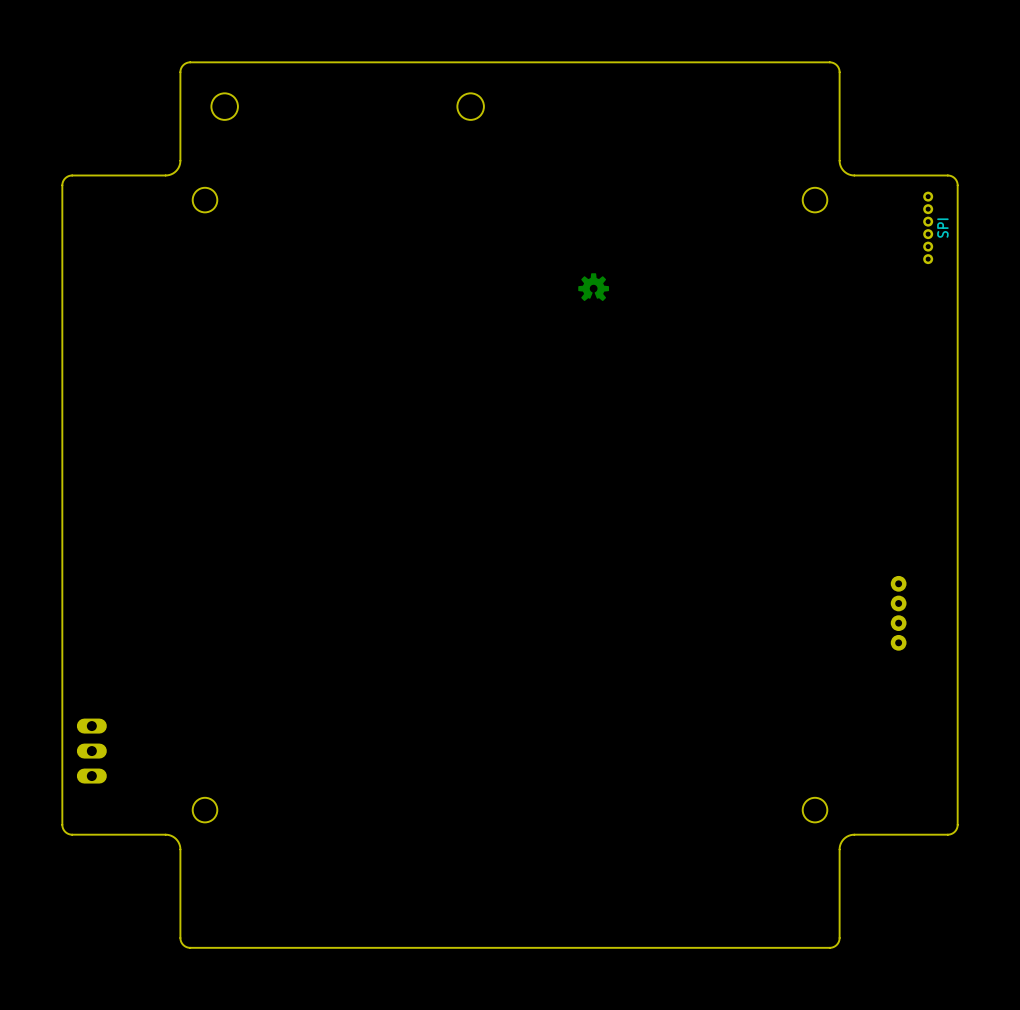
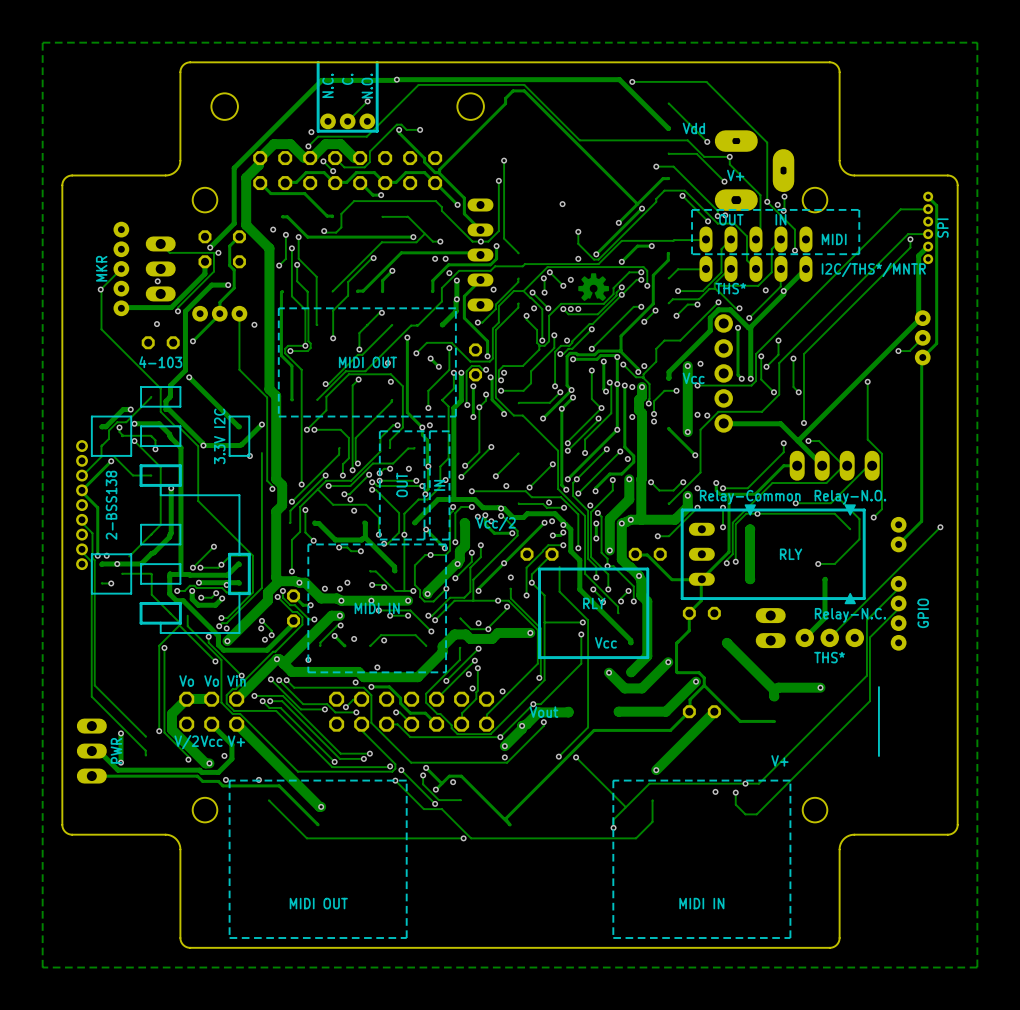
zone outline: none -> (977, 42) (42, 42) (42, 967) (977, 967) (977, 42)
line: none -> (377, 62) (377, 131) (318, 131) (318, 62)
text: none -> C. (347, 79)
via: none -> (396, 79)
track: none -> (632, 81) (706, 81) (767, 142) (767, 201) (794, 229) (794, 250)
via: none -> (632, 81)
text: none -> N.C. (327, 85)
text: none -> N.O. (367, 85)
track: none -> (367, 101) (347, 121)
via: none -> (367, 101)
track: none -> (668, 103) (707, 141)
part: none -> (347, 121)
track: none -> (668, 128) (619, 79) (321, 80) (234, 168) (234, 223) (210, 247)
text: none -> Vdd (693, 128)
track: none -> (399, 129) (399, 132) (424, 158) (424, 162) (435, 172) (438, 172)
via: none -> (399, 129)
track: none -> (420, 129) (406, 129) (401, 124) (396, 124) (369, 151) (369, 162) (364, 167) (344, 167) (335, 158)
via: none -> (420, 129)
via: none -> (311, 132)
via: none -> (707, 141)
track: none -> (308, 146) (318, 136) (366, 136) (418, 84) (524, 84) (579, 140) (687, 140) (704, 156) (729, 156) (729, 164) (760, 195) (760, 234) (756, 239)
via: none -> (308, 146)
track: none -> (668, 153) (696, 153) (724, 181)
via: none -> (729, 156)
track: none -> (360, 158) (354, 157) (340, 144) (325, 144) (310, 158) (303, 157) (290, 144) (273, 144) (260, 157) (258, 165) (246, 177) (246, 225) (269, 248) (269, 389) (276, 396) (276, 479) (282, 485) (282, 505) (276, 511) (276, 577) (279, 581)
track: none -> (504, 160) (504, 238) (518, 253)
via: none -> (504, 160)
track: none -> (323, 161) (333, 171)
via: none -> (323, 161)
track: none -> (656, 166) (673, 166) (717, 210) (717, 216)
via: none -> (656, 166)
part: none -> (347, 170)
part: none -> (754, 170)
via: none -> (333, 171)
track: none -> (438, 172) (464, 198) (464, 213) (480, 229)
track: none -> (438, 172) (439, 169) (505, 103) (505, 98) (513, 90) (524, 90) (637, 204)
text: none -> V+ (735, 175)
track: none -> (668, 178) (663, 178) (618, 222)
track: none -> (498, 180) (498, 231) (488, 241) (472, 241) (441, 210) (441, 207) (435, 201) (354, 201) (341, 213) (341, 227) (336, 232) (324, 231)
via: none -> (498, 180)
via: none -> (724, 181)
track: none -> (260, 183) (270, 193) (304, 193) (327, 216) (332, 216)
track: none -> (285, 183) (296, 182) (306, 172) (324, 172) (335, 183) (346, 182) (356, 172) (374, 172) (385, 183) (396, 182) (405, 172) (424, 172) (457, 204)
track: none -> (360, 183) (372, 195) (381, 195)
via: none -> (381, 195)
track: none -> (682, 195) (708, 221)
via: none -> (682, 195)
track: none -> (784, 196) (783, 210)
via: none -> (784, 196)
track: none -> (928, 196) (936, 205) (936, 343) (921, 358) (921, 521) (898, 544)
via: none -> (767, 201)
via: none -> (457, 204)
via: none -> (562, 204)
via: none -> (777, 204)
track: none -> (642, 208) (596, 254)
via: none -> (642, 208)
line: none -> (859, 209) (692, 209) (692, 254) (859, 254) (859, 209)
track: none -> (928, 209) (900, 209) (756, 354) (756, 381) (751, 385) (697, 385)
via: none -> (783, 210)
via: none -> (725, 215)
track: none -> (282, 216) (287, 216) (307, 237) (413, 237)
track: none -> (382, 216) (407, 216)
track: none -> (407, 216) (432, 241) (440, 241)
via: none -> (717, 216)
text: none -> OUT (731, 219)
text: none -> IN (780, 219)
via: none -> (708, 221)
via: none -> (618, 222)
via: none -> (273, 229)
via: none -> (324, 231)
track: none -> (578, 231) (578, 243) (594, 259) (598, 259) (656, 201) (656, 198) (664, 190) (684, 190) (717, 223) (734, 223) (747, 236) (747, 260) (755, 268)
via: none -> (578, 231)
track: none -> (425, 233) (416, 242) (381, 242) (332, 291)
track: none -> (285, 234) (285, 258) (279, 265)
via: none -> (285, 234)
track: none -> (928, 234) (908, 234) (779, 363) (779, 394) (762, 411) (718, 411) (700, 429) (700, 472) (668, 503)
track: none -> (239, 236) (229, 246) (229, 265) (234, 270) (234, 288) (219, 302) (219, 315) (192, 341)
track: none -> (298, 237) (298, 258) (316, 276) (317, 324)
via: none -> (298, 237)
via: none -> (413, 237)
track: none -> (706, 239) (621, 240) (598, 264) (525, 264) (522, 266) (495, 266) (490, 270) (459, 270) (441, 288) (441, 301) (417, 325) (411, 325) (365, 371) (345, 371) (317, 399)
track: none -> (730, 239) (721, 249) (721, 272) (702, 291) (678, 291)
part: none -> (755, 239)
track: none -> (780, 239) (771, 249) (771, 272) (758, 285) (720, 285)
text: none -> MIDI (834, 239)
track: none -> (910, 239) (910, 247) (803, 354) (803, 423)
via: none -> (910, 239)
via: none -> (440, 241)
via: none -> (480, 241)
track: none -> (160, 243) (169, 252) (218, 252)
track: none -> (496, 246) (496, 258) (490, 264) (448, 264) (432, 280) (432, 291)
via: none -> (496, 246)
track: none -> (651, 246) (637, 246) (621, 261)
via: none -> (651, 246)
track: none -> (928, 246) (918, 255) (918, 314) (922, 318) (797, 441)
via: none -> (210, 247)
track: none -> (291, 248) (291, 296) (305, 309) (305, 345) (288, 345) (285, 348) (285, 353) (301, 369) (301, 484)
via: none -> (291, 248)
part: none -> (205, 249)
part: none -> (239, 249)
via: none -> (794, 250)
track: none -> (213, 252) (213, 271) (177, 307) (177, 311)
via: none -> (218, 252)
track: none -> (668, 253) (668, 260) (653, 275) (653, 303) (621, 336) (620, 351)
track: none -> (480, 254) (478, 252) (401, 252) (363, 291) (357, 291)
part: none -> (480, 254)
via: none -> (596, 254)
track: none -> (373, 258) (348, 282) (348, 295) (333, 310) (333, 338)
via: none -> (373, 258)
via: none -> (435, 258)
via: none -> (445, 258)
via: none -> (578, 258)
track: none -> (204, 261) (204, 273) (171, 307) (121, 308)
via: none -> (621, 261)
track: none -> (297, 264) (297, 281) (307, 291) (308, 341) (310, 348) (307, 351) (290, 351)
via: none -> (297, 264)
via: none -> (279, 265)
text: none -> MKR (101, 268)
track: none -> (121, 268) (100, 289) (101, 329) (160, 388) (160, 411) (198, 446) (198, 501) (252, 555) (252, 592) (227, 617) (221, 617)
part: none -> (121, 268)
part: none -> (160, 268)
track: none -> (706, 268) (678, 269) (668, 278)
track: none -> (730, 268) (714, 283) (714, 288) (735, 308) (739, 308)
part: none -> (755, 268)
track: none -> (780, 268) (780, 286) (749, 318)
track: none -> (805, 268) (750, 327) (750, 378)
text: none -> I2C/THS*/MNTR (873, 269)
track: none -> (392, 270) (382, 280) (382, 291)
via: none -> (392, 270)
track: none -> (549, 272) (563, 285)
via: none -> (549, 272)
track: none -> (641, 272) (629, 272) (613, 288) (613, 294) (603, 303) (561, 303) (549, 315) (549, 341) (544, 345) (540, 345) (537, 342) (537, 330) (526, 319) (526, 315)
via: none -> (641, 272)
via: none -> (449, 273)
track: none -> (518, 278) (518, 282) (495, 304) (495, 309) (482, 322) (477, 322)
track: none -> (543, 278) (544, 292)
via: none -> (543, 278)
track: none -> (480, 279) (464, 296) (464, 318) (487, 341) (487, 356)
via: none -> (570, 279)
track: none -> (641, 279) (636, 279) (569, 345) (561, 345) (555, 351) (555, 386)
via: none -> (641, 279)
track: none -> (456, 280) (456, 311) (442, 324)
via: none -> (456, 280)
via: none -> (157, 281)
track: none -> (228, 285) (211, 285) (185, 311) (185, 370) (170, 385) (170, 396) (165, 401) (165, 409) (168, 408) (203, 445) (241, 444) (261, 424)
via: none -> (228, 285)
via: none -> (563, 285)
track: none -> (647, 285) (647, 270) (643, 267) (547, 267) (523, 291)
via: none -> (647, 285)
track: none -> (621, 287) (616, 292) (616, 295) (597, 314) (568, 314) (563, 309)
via: none -> (621, 287)
track: none -> (715, 288) (709, 288) (699, 299) (672, 299) (668, 303)
text: none -> THS* (730, 288)
via: none -> (100, 289)
via: none -> (493, 289)
via: none -> (765, 290)
track: none -> (282, 291) (281, 355) (291, 366) (292, 399)
track: none -> (523, 291) (513, 291) (498, 306) (498, 322) (492, 328) (492, 358) (489, 361) (470, 361) (451, 342) (426, 342) (416, 353)
track: none -> (523, 291) (542, 309) (542, 340)
via: none -> (678, 291)
via: none -> (783, 291)
track: none -> (532, 292) (548, 308)
via: none -> (532, 292)
via: none -> (544, 292)
via: none -> (621, 294)
via: none -> (456, 299)
track: none -> (718, 302) (680, 340) (664, 340) (656, 348) (656, 361) (643, 374) (643, 377)
via: none -> (718, 302)
track: none -> (518, 303) (518, 307) (495, 330) (495, 397) (513, 415) (522, 415) (558, 450) (558, 489) (585, 516) (585, 573) (618, 606) (618, 613)
track: none -> (697, 304) (687, 304) (676, 315)
via: none -> (697, 304)
track: none -> (641, 306) (633, 306) (591, 348)
via: none -> (641, 306)
line: none -> (455, 308) (278, 308) (278, 416) (455, 416) (455, 308)
via: none -> (534, 308)
via: none -> (548, 308)
via: none -> (739, 308)
via: none -> (563, 309)
via: none -> (570, 309)
via: none -> (578, 309)
track: none -> (655, 310) (644, 321)
via: none -> (655, 310)
via: none -> (177, 311)
track: none -> (381, 312) (379, 312) (359, 333) (359, 349)
via: none -> (381, 312)
part: none -> (219, 313)
track: none -> (239, 313) (239, 369) (267, 397) (267, 480) (272, 486) (272, 489)
via: none -> (526, 315)
via: none -> (676, 315)
via: none -> (749, 318)
via: none -> (644, 321)
via: none -> (477, 322)
via: none -> (156, 324)
via: none -> (254, 324)
track: none -> (392, 324) (362, 354) (357, 354) (328, 384) (325, 384)
track: none -> (738, 327) (738, 375) (741, 378)
via: none -> (738, 327)
track: none -> (750, 327) (730, 309) (718, 309) (710, 318) (710, 330) (669, 372) (668, 378)
track: none -> (591, 329) (572, 348) (568, 348) (563, 354) (560, 354)
via: none -> (591, 329)
track: none -> (554, 335) (554, 348) (531, 371) (531, 383) (523, 390) (501, 390)
via: none -> (554, 335)
track: none -> (407, 337) (407, 412) (422, 427) (422, 435) (427, 440) (428, 489) (425, 494)
via: none -> (407, 337)
track: none -> (922, 337) (909, 351) (898, 351)
part: none -> (922, 337)
via: none -> (333, 338)
via: none -> (542, 340)
via: none -> (567, 340)
track: none -> (778, 340) (778, 354) (766, 366)
via: none -> (778, 340)
via: none -> (192, 341)
part: none -> (160, 342)
via: none -> (305, 345)
track: none -> (539, 345) (539, 349) (522, 366) (503, 366) (498, 370) (498, 378) (501, 380)
track: none -> (449, 348) (449, 369) (428, 390) (428, 408)
via: none -> (449, 348)
via: none -> (591, 348)
via: none -> (359, 349)
via: none -> (290, 351)
track: none -> (620, 351) (638, 369) (638, 372)
track: none -> (620, 351) (598, 351) (594, 354) (570, 353) (567, 356) (567, 385) (571, 390) (543, 418)
via: none -> (898, 351)
via: none -> (416, 353)
via: none -> (560, 354)
via: none -> (487, 356)
track: none -> (761, 356) (761, 379) (773, 392)
via: none -> (761, 356)
via: none -> (617, 357)
track: none -> (430, 358) (438, 366)
via: none -> (430, 358)
track: none -> (793, 358) (793, 387) (798, 392)
via: none -> (793, 358)
track: none -> (573, 359) (597, 359) (600, 355) (617, 357) (617, 429) (567, 479)
via: none -> (573, 359)
track: none -> (603, 361) (603, 389) (606, 391)
via: none -> (603, 361)
text: none -> 4-103 (160, 362)
text: none -> MIDI OUT (367, 362)
part: none -> (475, 362)
via: none -> (387, 363)
via: none -> (700, 363)
track: none -> (623, 364) (636, 377) (642, 377) (649, 384) (648, 403)
via: none -> (623, 364)
via: none -> (438, 366)
via: none -> (644, 366)
track: none -> (687, 366) (687, 432)
via: none -> (687, 366)
via: none -> (766, 366)
track: none -> (486, 369) (479, 366) (471, 366) (466, 371) (467, 405)
via: none -> (486, 369)
track: none -> (591, 370) (591, 399) (601, 408) (567, 443)
via: none -> (591, 370)
track: none -> (453, 372) (453, 388) (442, 399) (448, 406) (448, 458) (440, 466) (440, 486) (427, 499) (418, 499) (404, 513) (404, 590)
via: none -> (453, 372)
track: none -> (461, 372) (461, 400) (453, 408) (453, 499)
via: none -> (461, 372)
via: none -> (504, 372)
via: none -> (638, 372)
part: none -> (723, 373)
track: none -> (189, 377) (239, 426)
via: none -> (189, 377)
track: none -> (490, 377) (492, 399) (504, 414)
via: none -> (490, 377)
text: none -> Vcc (693, 378)
via: none -> (741, 378)
via: none -> (750, 378)
track: none -> (358, 379) (352, 385) (352, 470)
via: none -> (358, 379)
via: none -> (501, 380)
via: none -> (390, 381)
track: none -> (867, 381) (867, 439) (881, 453) (881, 509) (873, 517)
via: none -> (867, 381)
track: none -> (609, 382) (611, 413) (585, 439) (585, 453)
via: none -> (609, 382)
via: none -> (325, 384)
via: none -> (617, 384)
track: none -> (624, 385) (624, 447) (633, 456) (633, 462) (621, 474) (609, 474) (595, 488) (595, 491)
via: none -> (624, 385)
via: none -> (697, 385)
track: none -> (473, 386) (473, 417)
via: none -> (473, 386)
via: none -> (555, 386)
line: none -> (180, 387) (141, 387) (141, 406) (180, 406) (180, 387)
via: none -> (632, 387)
track: none -> (642, 387) (642, 396) (639, 399) (639, 410) (642, 413) (641, 519)
via: none -> (642, 387)
via: none -> (501, 390)
via: none -> (571, 390)
track: none -> (676, 390) (664, 390) (654, 401) (654, 414)
via: none -> (676, 390)
via: none -> (606, 391)
track: none -> (560, 392) (549, 402) (518, 403)
via: none -> (560, 392)
via: none -> (773, 392)
via: none -> (798, 392)
track: none -> (486, 394) (486, 400) (479, 407) (479, 452) (465, 465)
via: none -> (486, 394)
track: none -> (151, 396) (126, 422) (117, 422) (108, 430) (108, 438) (101, 445) (101, 456) (82, 475)
track: none -> (573, 397) (561, 408) (561, 485) (566, 489)
via: none -> (573, 397)
track: none -> (392, 399) (355, 438) (355, 461) (357, 463)
via: none -> (648, 403)
via: none -> (467, 405)
via: none -> (479, 407)
via: none -> (428, 408)
via: none -> (561, 408)
via: none -> (601, 408)
track: none -> (130, 409) (123, 409) (105, 426) (101, 426)
via: none -> (130, 409)
via: none -> (504, 414)
via: none -> (654, 414)
via: none -> (697, 414)
via: none -> (707, 415)
line: none -> (131, 416) (91, 416) (91, 455) (131, 455) (131, 416)
line: none -> (249, 416) (229, 416) (229, 455) (249, 455) (249, 416)
via: none -> (473, 417)
via: none -> (632, 417)
via: none -> (543, 418)
track: none -> (598, 418) (567, 450)
via: none -> (598, 418)
via: none -> (654, 421)
track: none -> (134, 423) (159, 423) (180, 447) (180, 574)
via: none -> (134, 423)
track: none -> (723, 423) (780, 423) (822, 465)
via: none -> (803, 423)
via: none -> (261, 424)
track: none -> (397, 425) (393, 425) (380, 438) (380, 451) (351, 480) (326, 480) (300, 507) (300, 531) (291, 539) (291, 571)
via: none -> (397, 425)
via: none -> (429, 425)
line: none -> (180, 426) (180, 446) (141, 446) (141, 426) (180, 426)
track: none -> (119, 427) (122, 436) (150, 435) (155, 440) (155, 449)
via: none -> (119, 427)
via: none -> (422, 427)
track: none -> (668, 428) (695, 455)
track: none -> (306, 429) (326, 410) (326, 396) (348, 374) (390, 374) (402, 386) (402, 427) (390, 440) (389, 447)
via: none -> (306, 429)
track: none -> (314, 429) (340, 429) (348, 438) (348, 458) (342, 464) (342, 475)
via: none -> (314, 429)
via: none -> (617, 429)
line: none -> (424, 431) (379, 431) (379, 539) (424, 539) (424, 431)
line: none -> (449, 431) (429, 431) (429, 539) (449, 539) (449, 431)
via: none -> (687, 432)
text: none -> 3.3V I2C (219, 436)
track: none -> (134, 441) (160, 467) (160, 524) (129, 556)
via: none -> (134, 441)
track: none -> (808, 441) (818, 441) (842, 465) (847, 465) (842, 465) (826, 483) (772, 483) (732, 522) (732, 554) (726, 560) (726, 563)
via: none -> (808, 441)
via: none -> (567, 443)
track: none -> (783, 443) (783, 452) (747, 488) (723, 488)
via: none -> (783, 443)
via: none -> (203, 445)
track: none -> (339, 447) (339, 454) (291, 501)
track: none -> (414, 447) (408, 448) (393, 463) (372, 463) (350, 486) (328, 486)
track: none -> (491, 447) (461, 477)
via: none -> (491, 447)
via: none -> (155, 449)
track: none -> (606, 449) (573, 483) (573, 495) (588, 510) (588, 558) (596, 566) (596, 577)
via: none -> (606, 449)
via: none -> (567, 450)
track: none -> (620, 451) (578, 493)
via: none -> (620, 451)
track: none -> (261, 453) (261, 587) (226, 623) (222, 623) (219, 626)
track: none -> (518, 453) (495, 476)
via: none -> (585, 453)
via: none -> (695, 455)
track: none -> (101, 456) (113, 456) (132, 475) (151, 475)
via: none -> (249, 456)
via: none -> (627, 459)
track: none -> (111, 461) (82, 490) (97, 507) (97, 555)
via: none -> (111, 461)
via: none -> (357, 463)
track: none -> (552, 464) (529, 487)
via: none -> (552, 464)
line: none -> (180, 465) (141, 465) (141, 485) (180, 485) (180, 465)
via: none -> (465, 465)
track: none -> (797, 465) (783, 465) (755, 494) (720, 494) (716, 490) (716, 483)
part: none -> (834, 465)
track: none -> (872, 465) (868, 465) (830, 503) (795, 503)
via: none -> (428, 466)
track: none -> (390, 468) (384, 468) (379, 473)
via: none -> (390, 468)
via: none -> (408, 468)
via: none -> (352, 470)
via: none -> (379, 473)
track: none -> (369, 474) (349, 494) (344, 494)
via: none -> (369, 474)
track: none -> (325, 475) (290, 510) (289, 522)
via: none -> (325, 475)
via: none -> (342, 475)
via: none -> (495, 476)
via: none -> (461, 477)
via: none -> (567, 479)
via: none -> (576, 479)
track: none -> (629, 479) (629, 499) (609, 518) (609, 550)
via: none -> (629, 479)
via: none -> (379, 480)
track: none -> (416, 480) (379, 480)
via: none -> (416, 480)
via: none -> (445, 480)
track: none -> (612, 480) (612, 490) (591, 512) (591, 557) (608, 574) (608, 589)
via: none -> (612, 480)
track: none -> (372, 482) (377, 486) (422, 486)
via: none -> (372, 482)
via: none -> (651, 482)
track: none -> (683, 482) (673, 490) (659, 490) (651, 482)
via: none -> (683, 482)
via: none -> (716, 483)
via: none -> (301, 484)
text: none -> OUT (402, 484)
line: none -> (160, 485) (160, 495) (239, 495) (239, 554)
text: none -> IN (439, 485)
via: none -> (328, 486)
via: none -> (422, 486)
via: none -> (506, 486)
via: none -> (529, 487)
track: none -> (171, 488) (169, 536) (141, 563) (101, 564)
via: none -> (171, 488)
via: none -> (697, 488)
via: none -> (723, 488)
via: none -> (272, 489)
track: none -> (317, 489) (333, 504) (366, 504) (378, 517) (378, 534)
track: none -> (372, 489) (375, 489) (399, 513) (399, 532) (387, 543) (384, 543)
via: none -> (372, 489)
via: none -> (566, 489)
track: none -> (471, 491) (525, 491) (531, 497) (561, 497) (578, 514) (578, 548)
via: none -> (471, 491)
via: none -> (595, 491)
via: none -> (578, 493)
via: none -> (344, 494)
via: none -> (425, 494)
track: none -> (729, 494) (729, 551) (701, 579)
track: none -> (687, 495) (687, 507) (675, 519) (630, 519) (621, 523) (621, 559) (639, 575) (641, 580) (641, 595) (647, 601) (647, 656) (631, 672)
via: none -> (687, 495)
track: none -> (837, 496) (859, 518) (859, 539) (834, 563) (818, 563)
text: none -> Relay-Common (750, 497)
text: none -> Relay-N.O. (850, 497)
via: none -> (350, 499)
via: none -> (291, 501)
via: none -> (549, 502)
track: none -> (518, 503) (543, 504) (546, 507) (564, 507)
via: none -> (795, 503)
drawing: none -> [744, 504, 756, 516]
drawing: none -> [844, 504, 856, 516]
part: none -> (82, 505)
text: none -> 2-BSS138 (111, 505)
via: none -> (590, 505)
track: none -> (453, 507) (453, 510) (450, 513) (450, 550) (445, 554) (425, 554) (414, 565) (414, 584) (420, 590) (420, 596) (424, 601) (433, 601) (446, 588)
via: none -> (453, 507)
track: none -> (471, 507) (461, 507) (455, 513) (455, 542)
via: none -> (471, 507)
via: none -> (564, 507)
track: none -> (697, 507) (669, 536) (657, 536)
via: none -> (697, 507)
track: none -> (723, 507) (723, 527)
via: none -> (723, 507)
via: none -> (501, 508)
track: none -> (305, 510) (305, 532) (313, 540)
via: none -> (305, 510)
via: none -> (354, 510)
line: none -> (864, 510) (682, 510) (682, 598) (864, 598) (864, 510)
track: none -> (597, 513) (601, 516) (601, 552) (607, 558) (607, 566) (613, 566) (633, 586) (633, 601)
via: none -> (597, 513)
via: none -> (757, 513)
track: none -> (485, 515) (485, 524) (494, 533) (512, 533)
via: none -> (485, 515)
via: none -> (477, 516)
track: none -> (501, 516) (517, 530) (517, 535) (473, 579) (473, 600)
via: none -> (501, 516)
via: none -> (873, 517)
track: none -> (82, 519) (82, 523) (92, 533) (92, 557) (94, 560) (94, 685) (145, 736)
via: none -> (630, 519)
via: none -> (491, 521)
via: none -> (552, 521)
track: none -> (314, 522) (318, 523) (335, 539) (361, 539) (365, 537)
track: none -> (364, 522) (365, 537)
track: none -> (414, 522) (438, 499) (474, 499) (483, 507) (504, 508) (513, 517) (523, 517) (527, 513) (555, 513) (563, 521) (563, 524) (565, 524) (570, 529) (570, 551) (579, 560) (579, 589) (631, 642)
track: none -> (464, 522) (465, 545) (459, 551) (457, 563) (427, 593)
track: none -> (544, 522) (478, 588) (478, 590)
via: none -> (544, 522)
text: none -> Vcc/2 (495, 523)
track: none -> (596, 523) (596, 538)
via: none -> (596, 523)
via: none -> (621, 523)
line: none -> (180, 524) (180, 544) (141, 544) (141, 524) (180, 524)
via: none -> (563, 524)
via: none -> (723, 527)
track: none -> (940, 527) (829, 637)
via: none -> (940, 527)
track: none -> (426, 529) (444, 548)
via: none -> (426, 529)
track: none -> (750, 529) (750, 579)
track: none -> (850, 529) (834, 513) (746, 513) (735, 524) (735, 561)
track: none -> (563, 532) (560, 535) (552, 535)
via: none -> (563, 532)
via: none -> (512, 533)
via: none -> (378, 534)
via: none -> (404, 534)
part: none -> (898, 534)
via: none -> (552, 535)
via: none -> (657, 536)
track: none -> (365, 537) (394, 566) (394, 570)
via: none -> (596, 538)
via: none -> (313, 540)
via: none -> (455, 542)
via: none -> (384, 543)
line: none -> (446, 544) (308, 544) (308, 672) (446, 672) (446, 544)
track: none -> (480, 545) (480, 557) (470, 567) (470, 591) (464, 597) (450, 597) (432, 615) (428, 615)
via: none -> (480, 545)
track: none -> (563, 545) (548, 545) (526, 567) (526, 595)
via: none -> (563, 545)
track: none -> (213, 546) (192, 567)
via: none -> (213, 546)
track: none -> (339, 547) (347, 547) (351, 551) (360, 551)
via: none -> (339, 547)
via: none -> (444, 548)
via: none -> (578, 548)
track: none -> (82, 549) (82, 552) (91, 561) (91, 696) (145, 750) (145, 755)
via: none -> (609, 550)
via: none -> (360, 551)
track: none -> (471, 552) (471, 561) (455, 578)
via: none -> (471, 552)
line: none -> (131, 554) (91, 554) (91, 593) (131, 593) (131, 554)
line: none -> (249, 554) (229, 554) (229, 593) (249, 593) (249, 554)
via: none -> (430, 554)
part: none -> (539, 554)
track: none -> (552, 554) (531, 574) (531, 582) (544, 595) (544, 680) (490, 734) (457, 734) (451, 728) (451, 725) (426, 702) (426, 693) (459, 659) (460, 647)
track: none -> (635, 554) (647, 554) (672, 579) (701, 579)
part: none -> (647, 554)
part: none -> (701, 554)
text: none -> RLY (791, 554)
via: none -> (97, 555)
via: none -> (106, 555)
via: none -> (735, 561)
via: none -> (117, 563)
via: none -> (457, 563)
via: none -> (504, 563)
via: none -> (726, 563)
via: none -> (818, 563)
line: none -> (180, 564) (180, 583) (141, 583) (141, 564) (180, 564)
via: none -> (221, 564)
track: none -> (239, 564) (227, 575) (170, 573) (169, 593) (176, 600) (183, 600) (218, 635) (218, 644) (223, 650) (267, 650) (293, 623) (293, 620)
track: none -> (559, 566) (559, 591) (588, 620) (588, 727) (558, 756)
via: none -> (607, 566)
via: none -> (192, 567)
track: none -> (200, 567) (218, 567) (230, 555) (248, 555) (249, 590) (226, 592) (222, 587) (196, 587) (194, 585) (189, 585) (184, 590) (177, 590)
via: none -> (200, 567)
line: none -> (647, 569) (539, 569) (539, 657) (647, 657) (647, 569)
track: none -> (370, 570) (375, 571) (395, 590) (413, 590)
via: none -> (291, 571)
track: none -> (122, 573) (151, 573) (151, 594) (180, 623) (159, 645) (159, 731)
via: none -> (639, 575)
via: none -> (510, 577)
via: none -> (596, 577)
via: none -> (455, 578)
track: none -> (701, 579) (701, 600) (689, 613)
track: none -> (825, 579) (824, 617) (804, 637)
track: none -> (279, 581) (267, 592) (267, 600) (227, 641)
track: none -> (279, 581) (305, 582) (321, 598) (336, 598) (341, 600) (408, 600)
track: none -> (198, 582) (239, 583)
via: none -> (198, 582)
via: none -> (299, 582)
via: none -> (347, 582)
via: none -> (531, 582)
track: none -> (101, 583) (111, 583)
via: none -> (111, 583)
track: none -> (898, 583) (898, 588) (866, 620) (866, 675) (759, 783) (649, 783) (613, 819) (613, 827)
via: none -> (226, 584)
track: none -> (372, 584) (381, 584) (384, 587)
via: none -> (372, 584)
via: none -> (384, 587)
via: none -> (324, 588)
via: none -> (339, 588)
via: none -> (446, 588)
track: none -> (510, 588) (510, 598) (540, 628) (539, 677)
track: none -> (593, 589) (603, 599) (603, 602)
via: none -> (593, 589)
via: none -> (608, 589)
via: none -> (177, 590)
track: none -> (192, 590) (192, 599) (198, 605) (215, 605) (222, 598)
via: none -> (192, 590)
track: none -> (282, 590) (282, 597) (290, 605) (294, 605) (309, 619) (314, 619)
via: none -> (282, 590)
via: none -> (413, 590)
via: none -> (478, 590)
track: none -> (628, 590) (621, 598) (621, 601)
via: none -> (628, 590)
drawing: none -> [844, 592, 856, 605]
track: none -> (216, 593) (211, 597) (201, 597)
via: none -> (216, 593)
line: none -> (239, 593) (239, 632) (160, 632) (160, 623)
via: none -> (427, 593)
track: none -> (293, 595) (303, 605) (310, 605)
via: none -> (526, 595)
track: none -> (277, 596) (292, 611) (297, 611) (302, 617) (302, 624) (235, 689) (232, 689) (226, 695) (226, 703) (234, 710) (276, 710) (332, 767) (390, 766)
via: none -> (277, 596)
via: none -> (201, 597)
via: none -> (222, 598)
via: none -> (341, 600)
via: none -> (371, 600)
via: none -> (408, 600)
via: none -> (498, 600)
via: none -> (621, 601)
via: none -> (633, 601)
via: none -> (603, 602)
line: none -> (180, 603) (180, 623) (141, 623) (141, 603) (180, 603)
text: none -> RLY (594, 603)
track: none -> (898, 603) (898, 608) (869, 637) (869, 701) (756, 814) (745, 814) (735, 804) (735, 792)
via: none -> (310, 605)
track: none -> (507, 606) (507, 608) (486, 629)
via: none -> (507, 606)
part: none -> (293, 608)
text: none -> MIDI IN (377, 608)
track: none -> (378, 610) (410, 610) (431, 631)
via: none -> (378, 610)
track: none -> (689, 613) (689, 630) (676, 643) (676, 671) (699, 672) (704, 677) (704, 685)
part: none -> (701, 613)
text: none -> GPIO (923, 613)
track: none -> (187, 615) (187, 626) (221, 659) (221, 702) (232, 713) (240, 713) (297, 771) (392, 771) (395, 768) (395, 764) (361, 730) (361, 724)
track: none -> (339, 615) (331, 615) (283, 663)
via: none -> (339, 615)
via: none -> (390, 615)
track: none -> (408, 615) (390, 615)
via: none -> (408, 615)
via: none -> (428, 615)
text: none -> Relay-N.C. (850, 615)
via: none -> (221, 617)
track: none -> (460, 618) (471, 629) (488, 629)
via: none -> (314, 619)
track: none -> (261, 620) (271, 630) (271, 635)
via: none -> (261, 620)
track: none -> (435, 620) (454, 600) (508, 600) (537, 629) (537, 663) (486, 714) (486, 724)
via: none -> (435, 620)
track: none -> (582, 622) (544, 622)
via: none -> (582, 622)
via: none -> (478, 623)
track: none -> (179, 625) (215, 661)
track: none -> (340, 625) (337, 625) (320, 642) (320, 645)
via: none -> (340, 625)
via: none -> (219, 626)
via: none -> (226, 628)
via: none -> (261, 628)
part: none -> (770, 628)
via: none -> (488, 629)
via: none -> (431, 631)
track: none -> (530, 632) (498, 632) (492, 638) (470, 638) (465, 634) (454, 634) (442, 646) (442, 652) (417, 677) (363, 677) (358, 671) (291, 671) (276, 659) (236, 699)
via: none -> (530, 632)
track: none -> (581, 634) (581, 663) (540, 704) (533, 704) (500, 737) (410, 737) (397, 724) (386, 724)
via: none -> (581, 634)
via: none -> (271, 635)
track: none -> (334, 635) (345, 645)
via: none -> (334, 635)
track: none -> (208, 636) (208, 642) (241, 675)
via: none -> (208, 636)
part: none -> (829, 637)
via: none -> (354, 638)
via: none -> (264, 639)
via: none -> (384, 640)
via: none -> (227, 641)
text: none -> Vcc (605, 642)
track: none -> (726, 642) (773, 689)
track: none -> (426, 645) (415, 635) (381, 635) (370, 645)
track: none -> (164, 647) (164, 732) (188, 756) (188, 759)
via: none -> (164, 647)
track: none -> (478, 648) (446, 680)
via: none -> (478, 648)
text: none -> THS* (829, 657)
via: none -> (276, 659)
via: none -> (308, 659)
track: none -> (474, 660) (436, 699)
via: none -> (474, 660)
via: none -> (215, 661)
track: none -> (668, 662) (642, 688) (624, 688) (609, 672)
via: none -> (668, 662)
via: none -> (377, 667)
track: none -> (477, 668) (476, 698) (462, 713) (461, 724)
via: none -> (477, 668)
via: none -> (609, 672)
via: none -> (468, 674)
via: none -> (241, 675)
via: none -> (539, 677)
track: none -> (270, 679) (300, 709) (324, 709)
via: none -> (270, 679)
track: none -> (279, 680) (303, 704) (327, 704) (335, 712) (356, 712)
via: none -> (279, 680)
track: none -> (286, 680) (294, 687) (363, 687) (371, 695) (371, 722) (411, 762) (507, 762) (543, 725) (543, 722)
via: none -> (286, 680)
via: none -> (446, 680)
text: none -> Vo (186, 681)
text: none -> Vo (211, 681)
text: none -> Vin (236, 681)
track: none -> (696, 681) (666, 711) (618, 711)
via: none -> (696, 681)
via: none -> (355, 682)
track: none -> (704, 685) (690, 699) (690, 711) (670, 730) (594, 730) (505, 818) (510, 824) (461, 776) (449, 776) (435, 789)
track: none -> (704, 685) (740, 721) (774, 721)
track: none -> (371, 686) (389, 686) (400, 698) (400, 703) (410, 713) (425, 713) (436, 724)
via: none -> (371, 686)
track: none -> (820, 687) (778, 687) (773, 689)
via: none -> (820, 687)
line: none -> (878, 687) (878, 755)
via: none -> (472, 688)
track: none -> (773, 689) (774, 696)
via: none -> (502, 691)
track: none -> (254, 695) (282, 695) (340, 753) (369, 753)
via: none -> (254, 695)
track: none -> (211, 699) (186, 699) (171, 713) (171, 729) (205, 763) (209, 763)
track: none -> (361, 699) (353, 699) (345, 707)
track: none -> (262, 701) (269, 707) (280, 707) (334, 761)
via: none -> (262, 701)
track: none -> (270, 701) (282, 701) (339, 758) (363, 758)
via: none -> (270, 701)
via: none -> (533, 704)
via: none -> (345, 707)
via: none -> (324, 709)
part: none -> (211, 711)
part: none -> (411, 711)
track: none -> (568, 711) (538, 712) (526, 724) (522, 725) (522, 728) (504, 746)
part: none -> (701, 711)
track: none -> (714, 711) (656, 770)
via: none -> (356, 712)
track: none -> (396, 712) (399, 712) (411, 724)
via: none -> (396, 712)
text: none -> Vout (543, 712)
via: none -> (543, 722)
track: none -> (211, 724) (231, 744) (231, 758) (218, 772) (201, 772) (199, 770) (117, 770) (99, 751) (91, 751)
track: none -> (236, 724) (321, 806)
via: none -> (522, 725)
via: none -> (159, 731)
track: none -> (120, 733) (120, 762)
via: none -> (120, 733)
via: none -> (500, 737)
text: none -> Vcc (211, 741)
text: none -> V+ (236, 741)
text: none -> V/2 (186, 742)
via: none -> (504, 746)
text: none -> PWR (116, 750)
via: none -> (369, 753)
via: none -> (224, 755)
via: none -> (558, 756)
via: none -> (504, 757)
track: none -> (576, 757) (625, 807)
via: none -> (576, 757)
via: none -> (363, 758)
via: none -> (188, 759)
text: none -> V+ (779, 760)
via: none -> (334, 761)
via: none -> (120, 762)
via: none -> (209, 763)
via: none -> (390, 766)
track: none -> (426, 767) (441, 783)
via: none -> (426, 767)
track: none -> (401, 770) (435, 803)
via: none -> (401, 770)
via: none -> (656, 770)
track: none -> (423, 775) (423, 784) (438, 800) (460, 800)
via: none -> (423, 775)
track: none -> (91, 776) (197, 776) (202, 781) (218, 781) (222, 785) (279, 785) (318, 824)
via: none -> (225, 779)
via: none -> (258, 779)
track: none -> (395, 780) (423, 809) (441, 809) (471, 838) (636, 838) (652, 821) (652, 800)
via: none -> (395, 780)
line: none -> (406, 780) (406, 938) (229, 938) (229, 780) (406, 780)
line: none -> (790, 780) (613, 780) (613, 938) (790, 938) (790, 780)
via: none -> (453, 782)
via: none -> (745, 783)
via: none -> (435, 789)
via: none -> (715, 791)
via: none -> (735, 792)
track: none -> (268, 800) (306, 838) (463, 838)
via: none -> (435, 803)
via: none -> (321, 806)
via: none -> (613, 827)
via: none -> (463, 838)
text: none -> MIDI OUT (318, 903)
text: none -> MIDI IN (701, 903)

